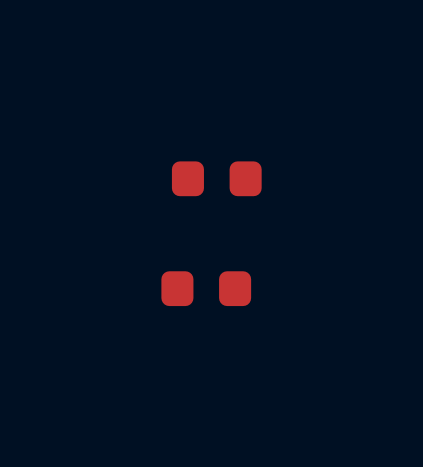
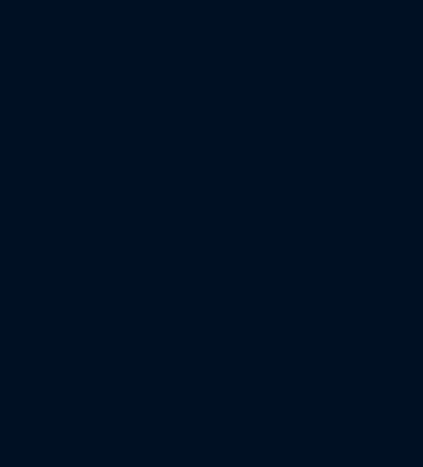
part: (216, 178) -> none
part: (206, 288) -> none

